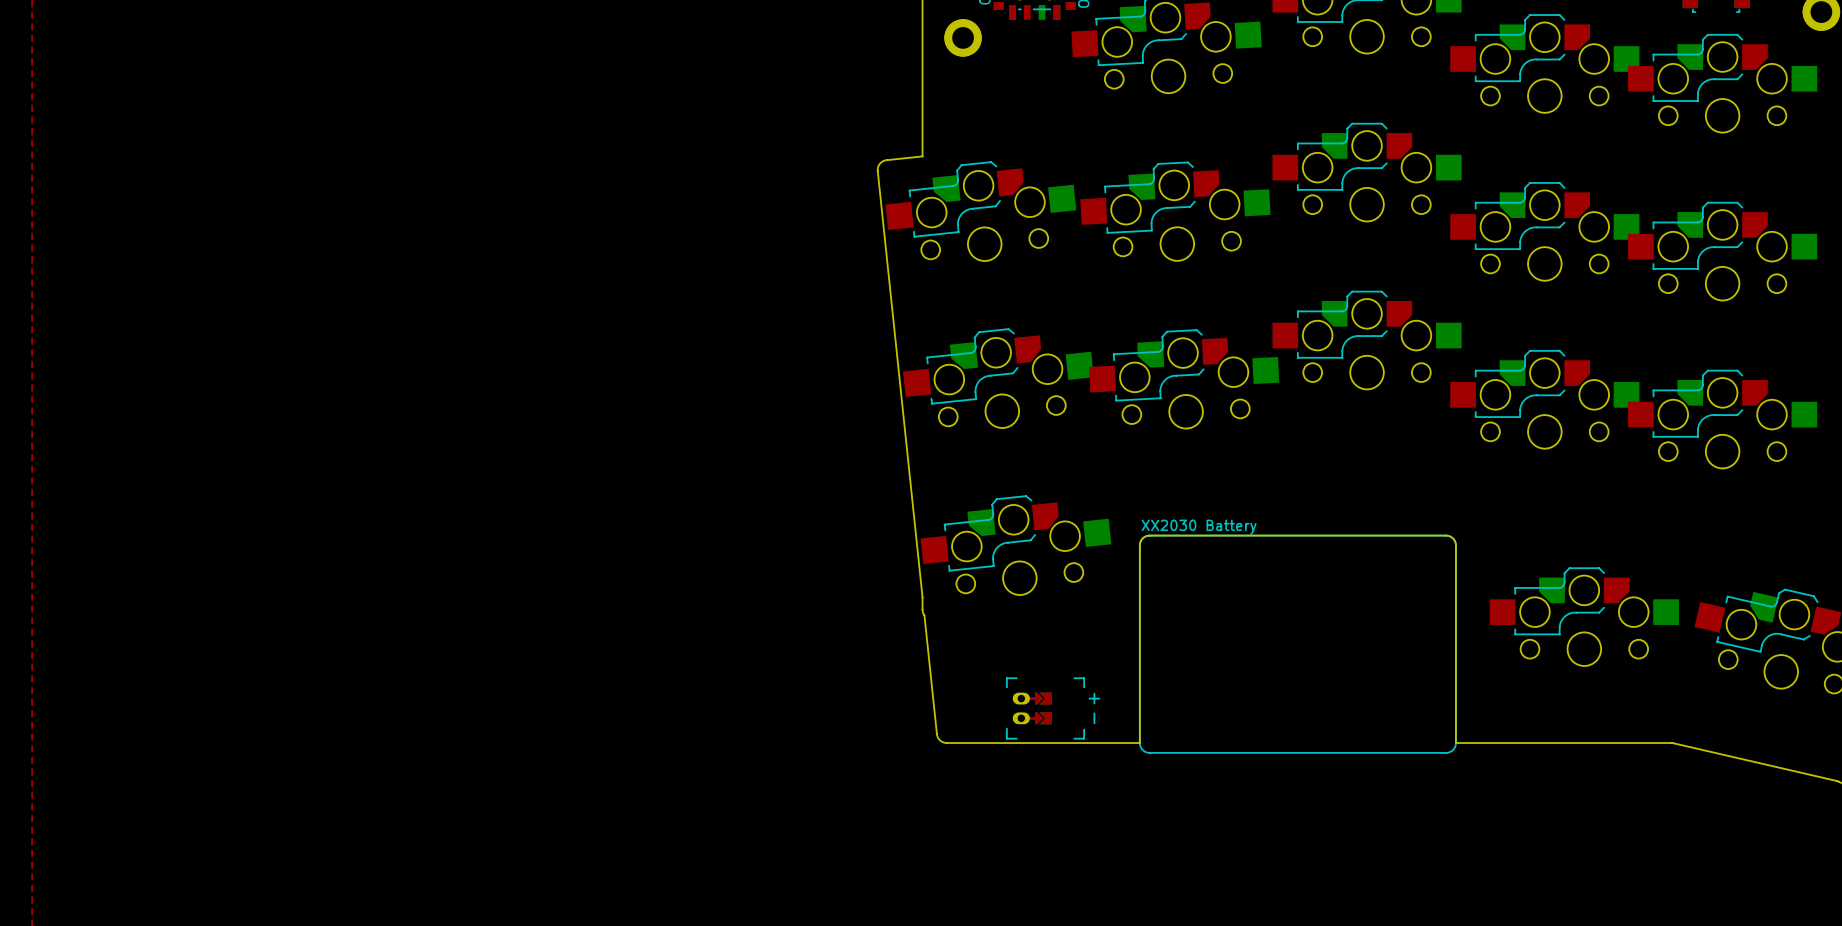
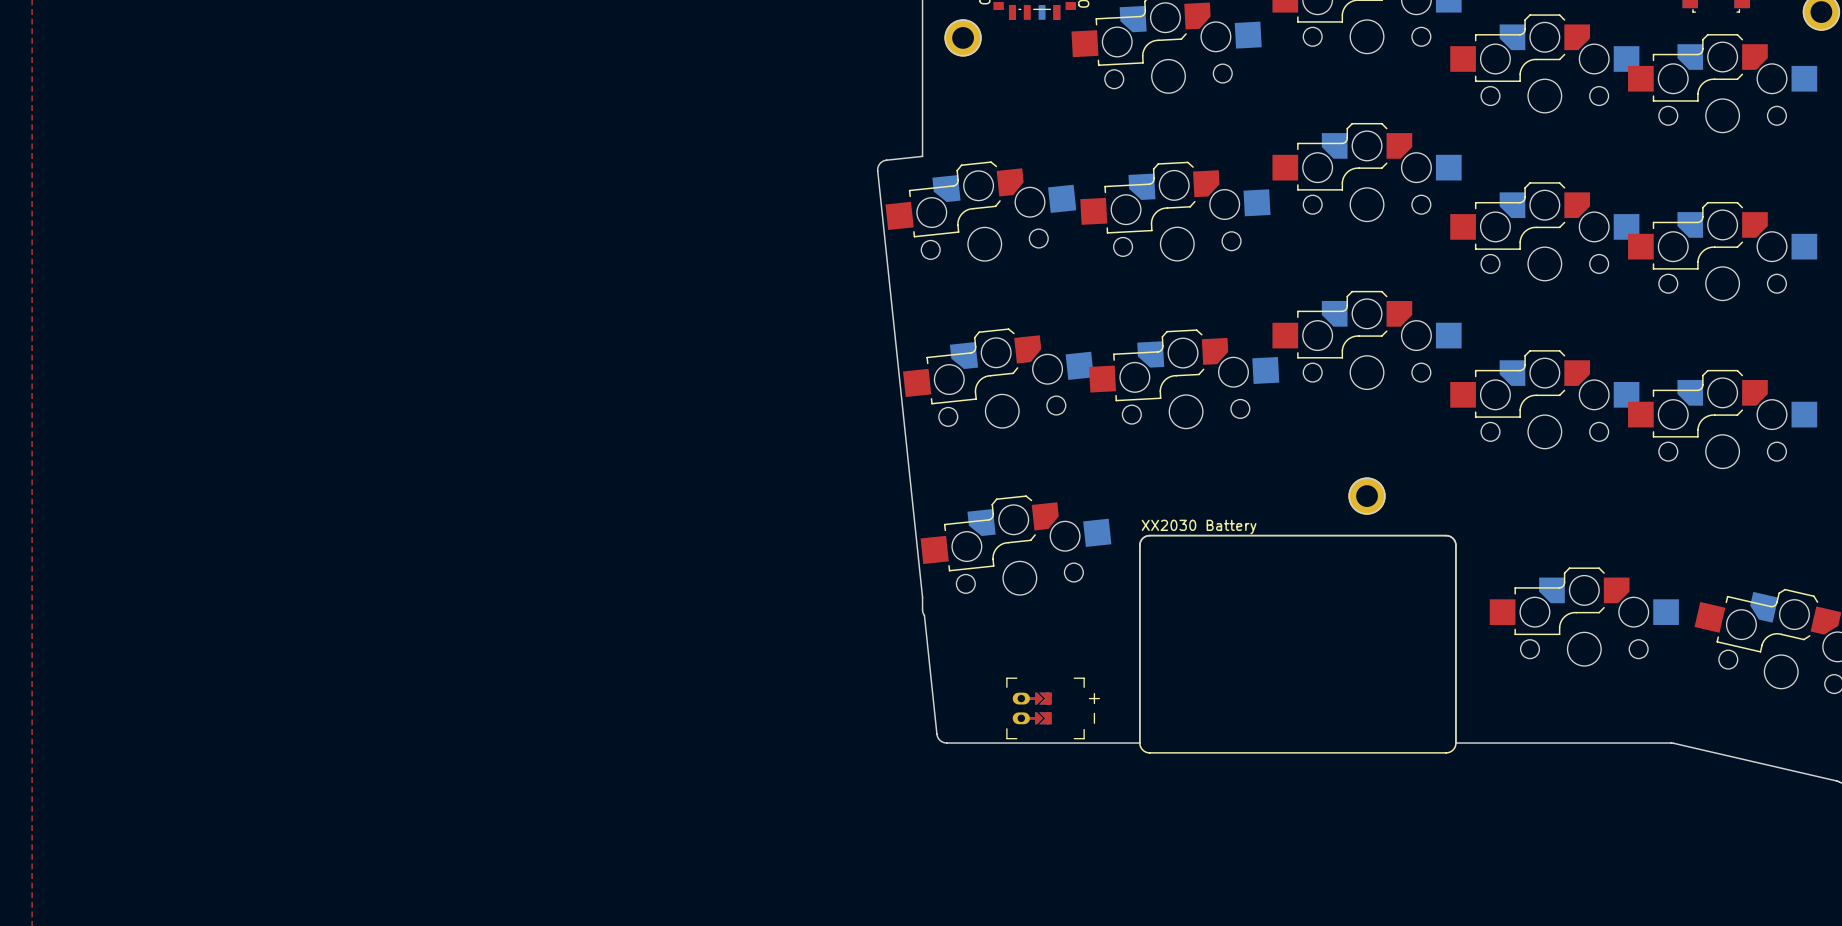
round board edge: none -> [1348, 477, 1386, 515]
part: none -> (1367, 496)

